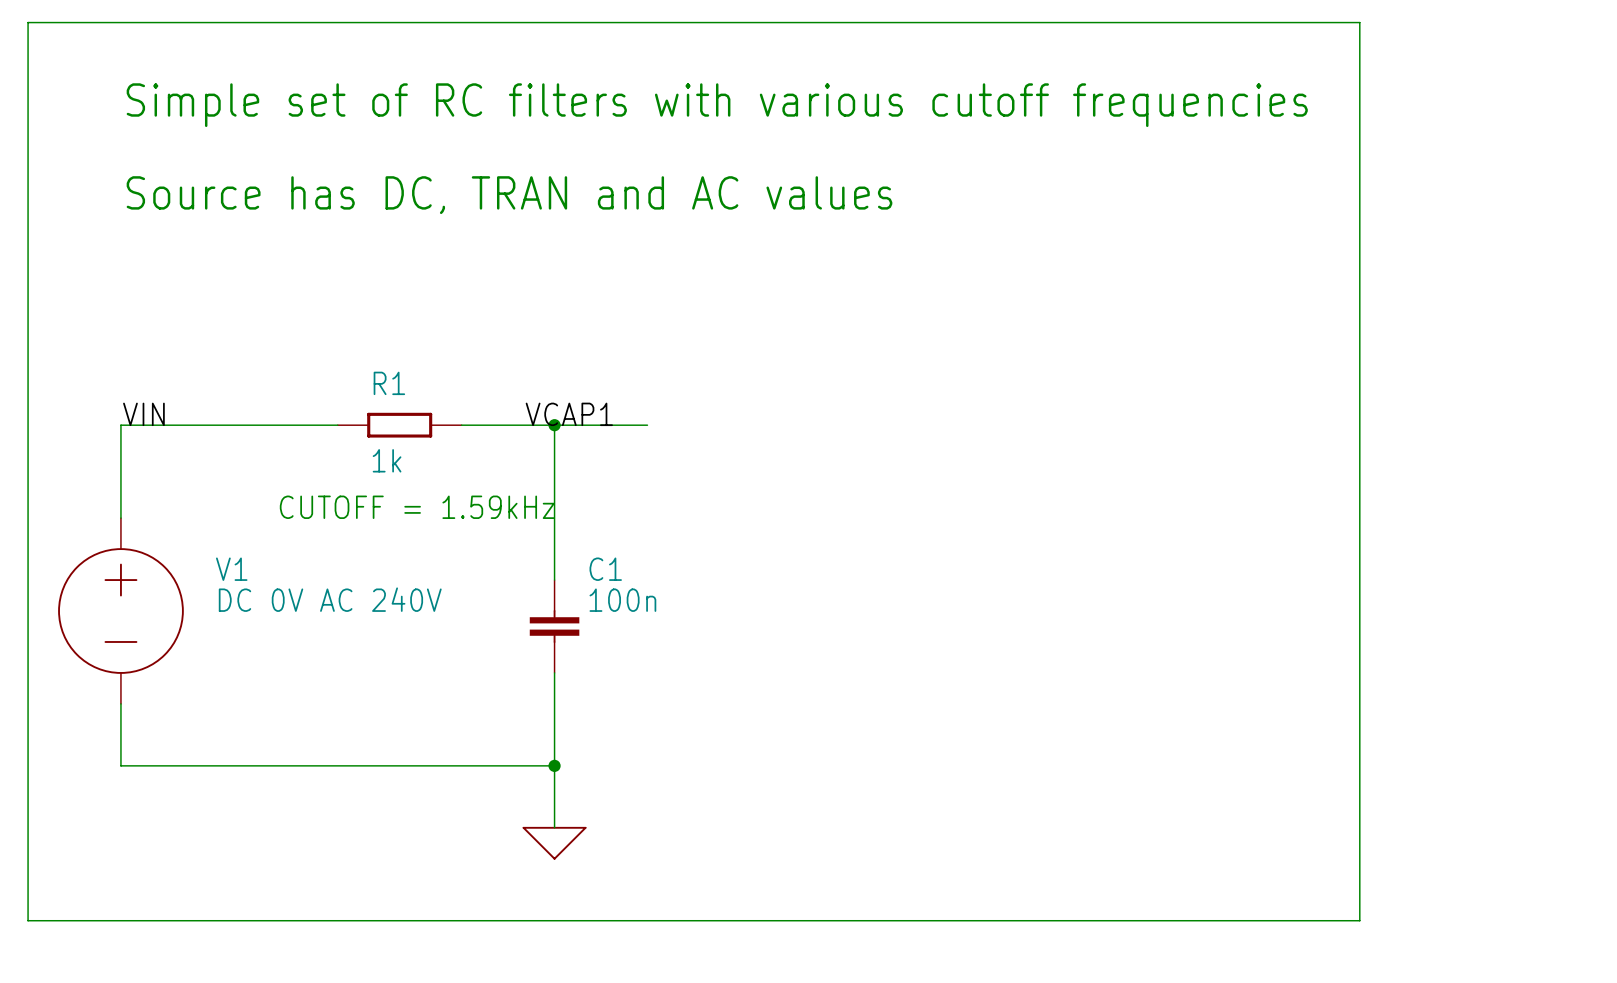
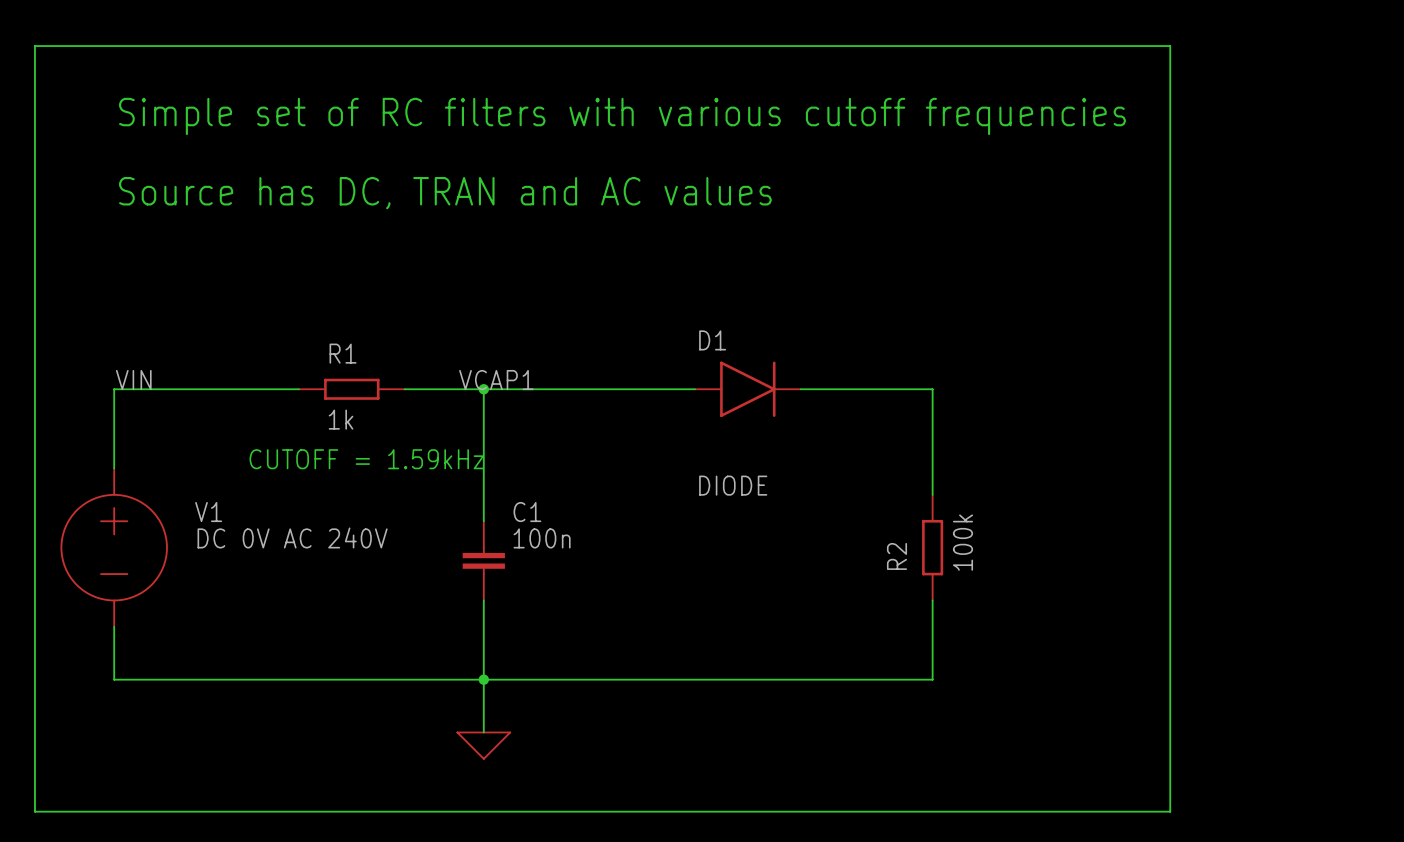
wire: none -> (563, 389) (695, 389)
D1: none -> DIODE (747, 389)
wire: none -> (800, 389) (932, 389) (932, 494)
R2: none -> 100k (932, 547)
wire: none -> (932, 600) (932, 679) (483, 679)

